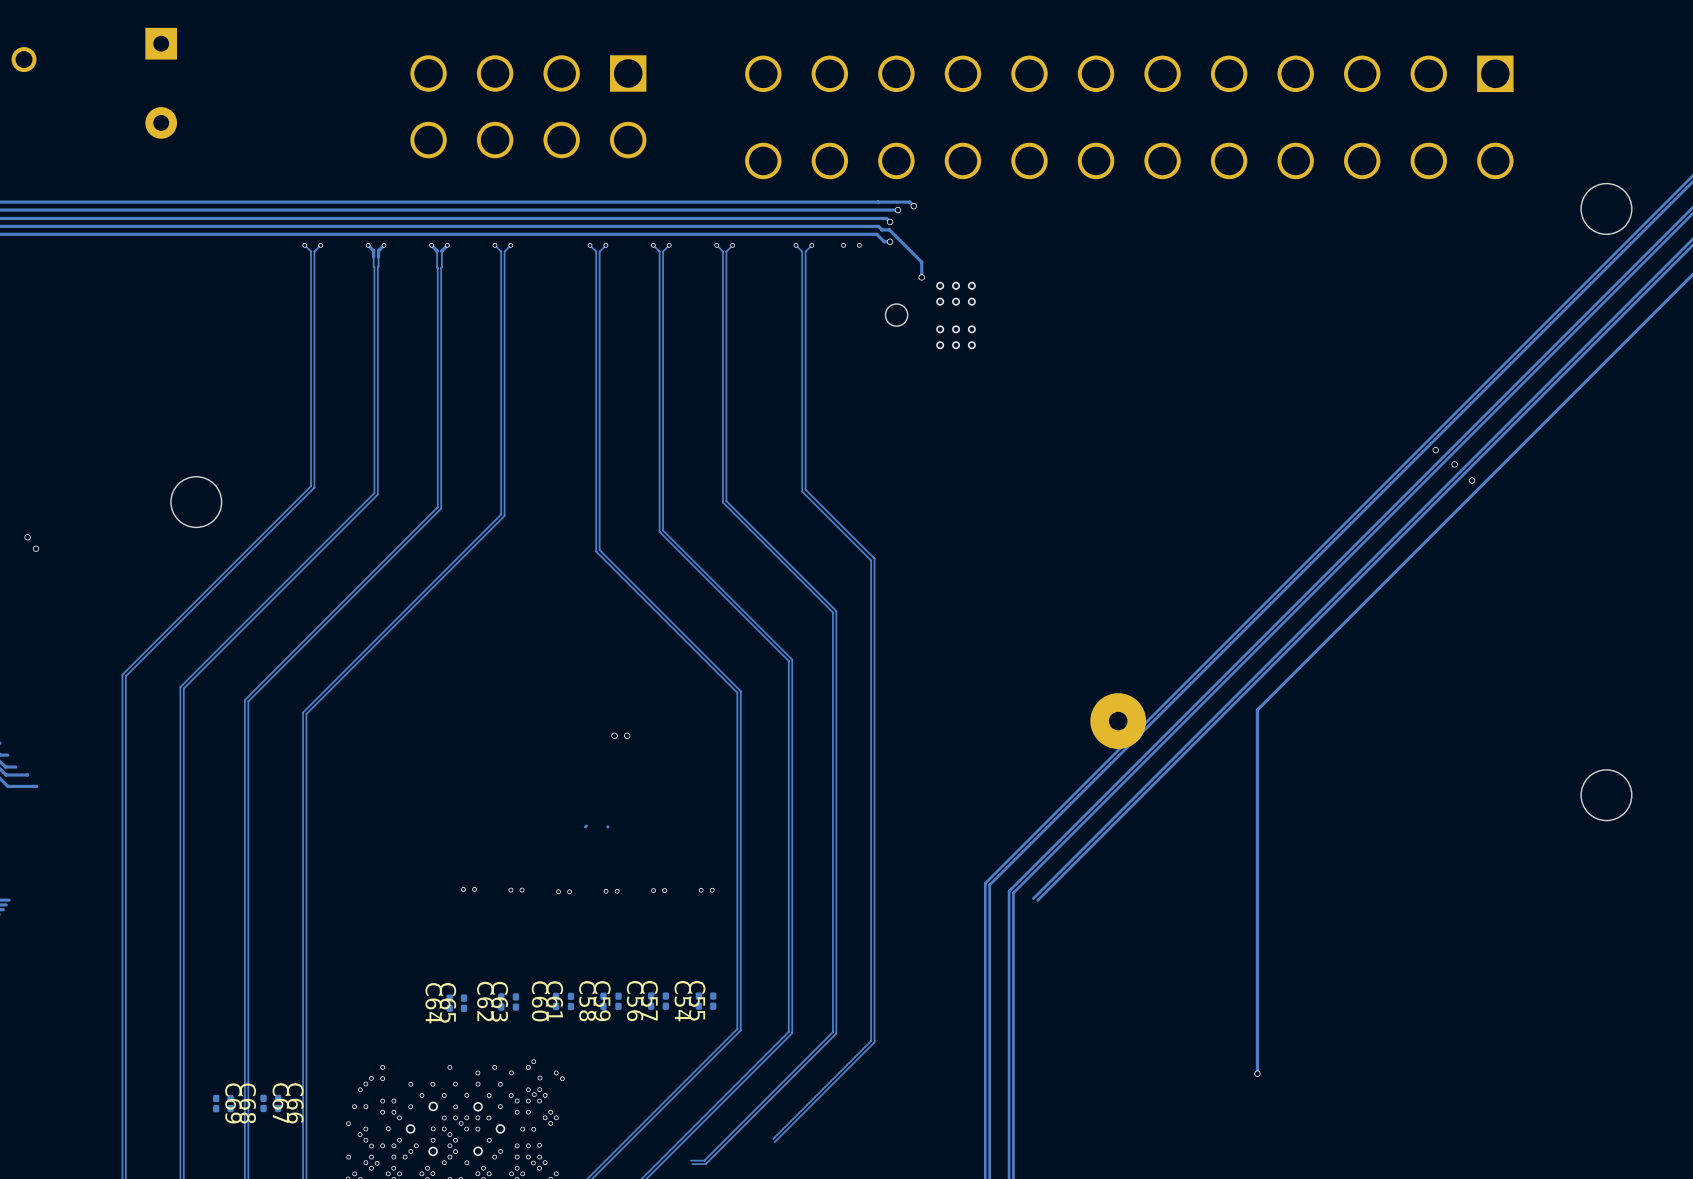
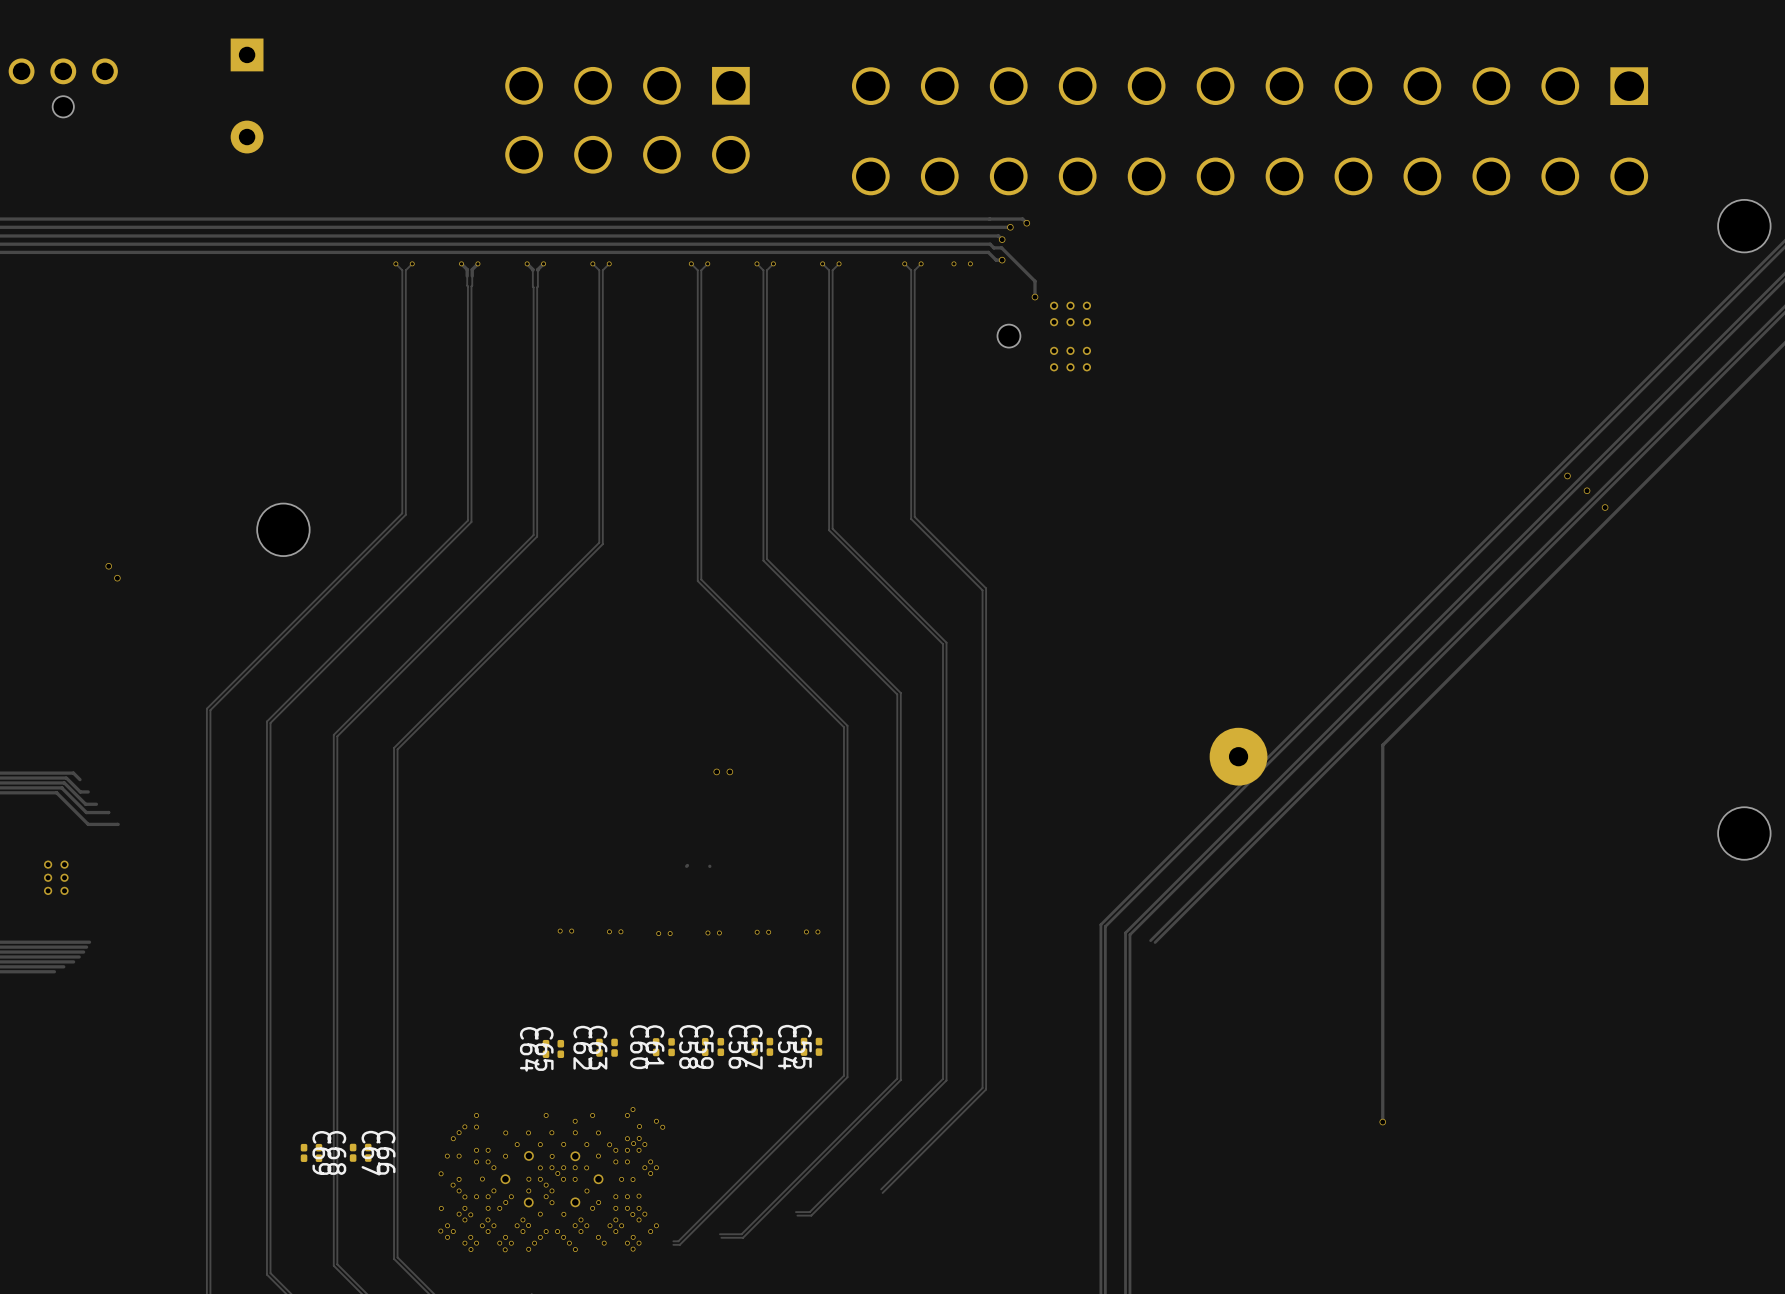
via: (511, 1072) -> none
via: (449, 1157) -> none

